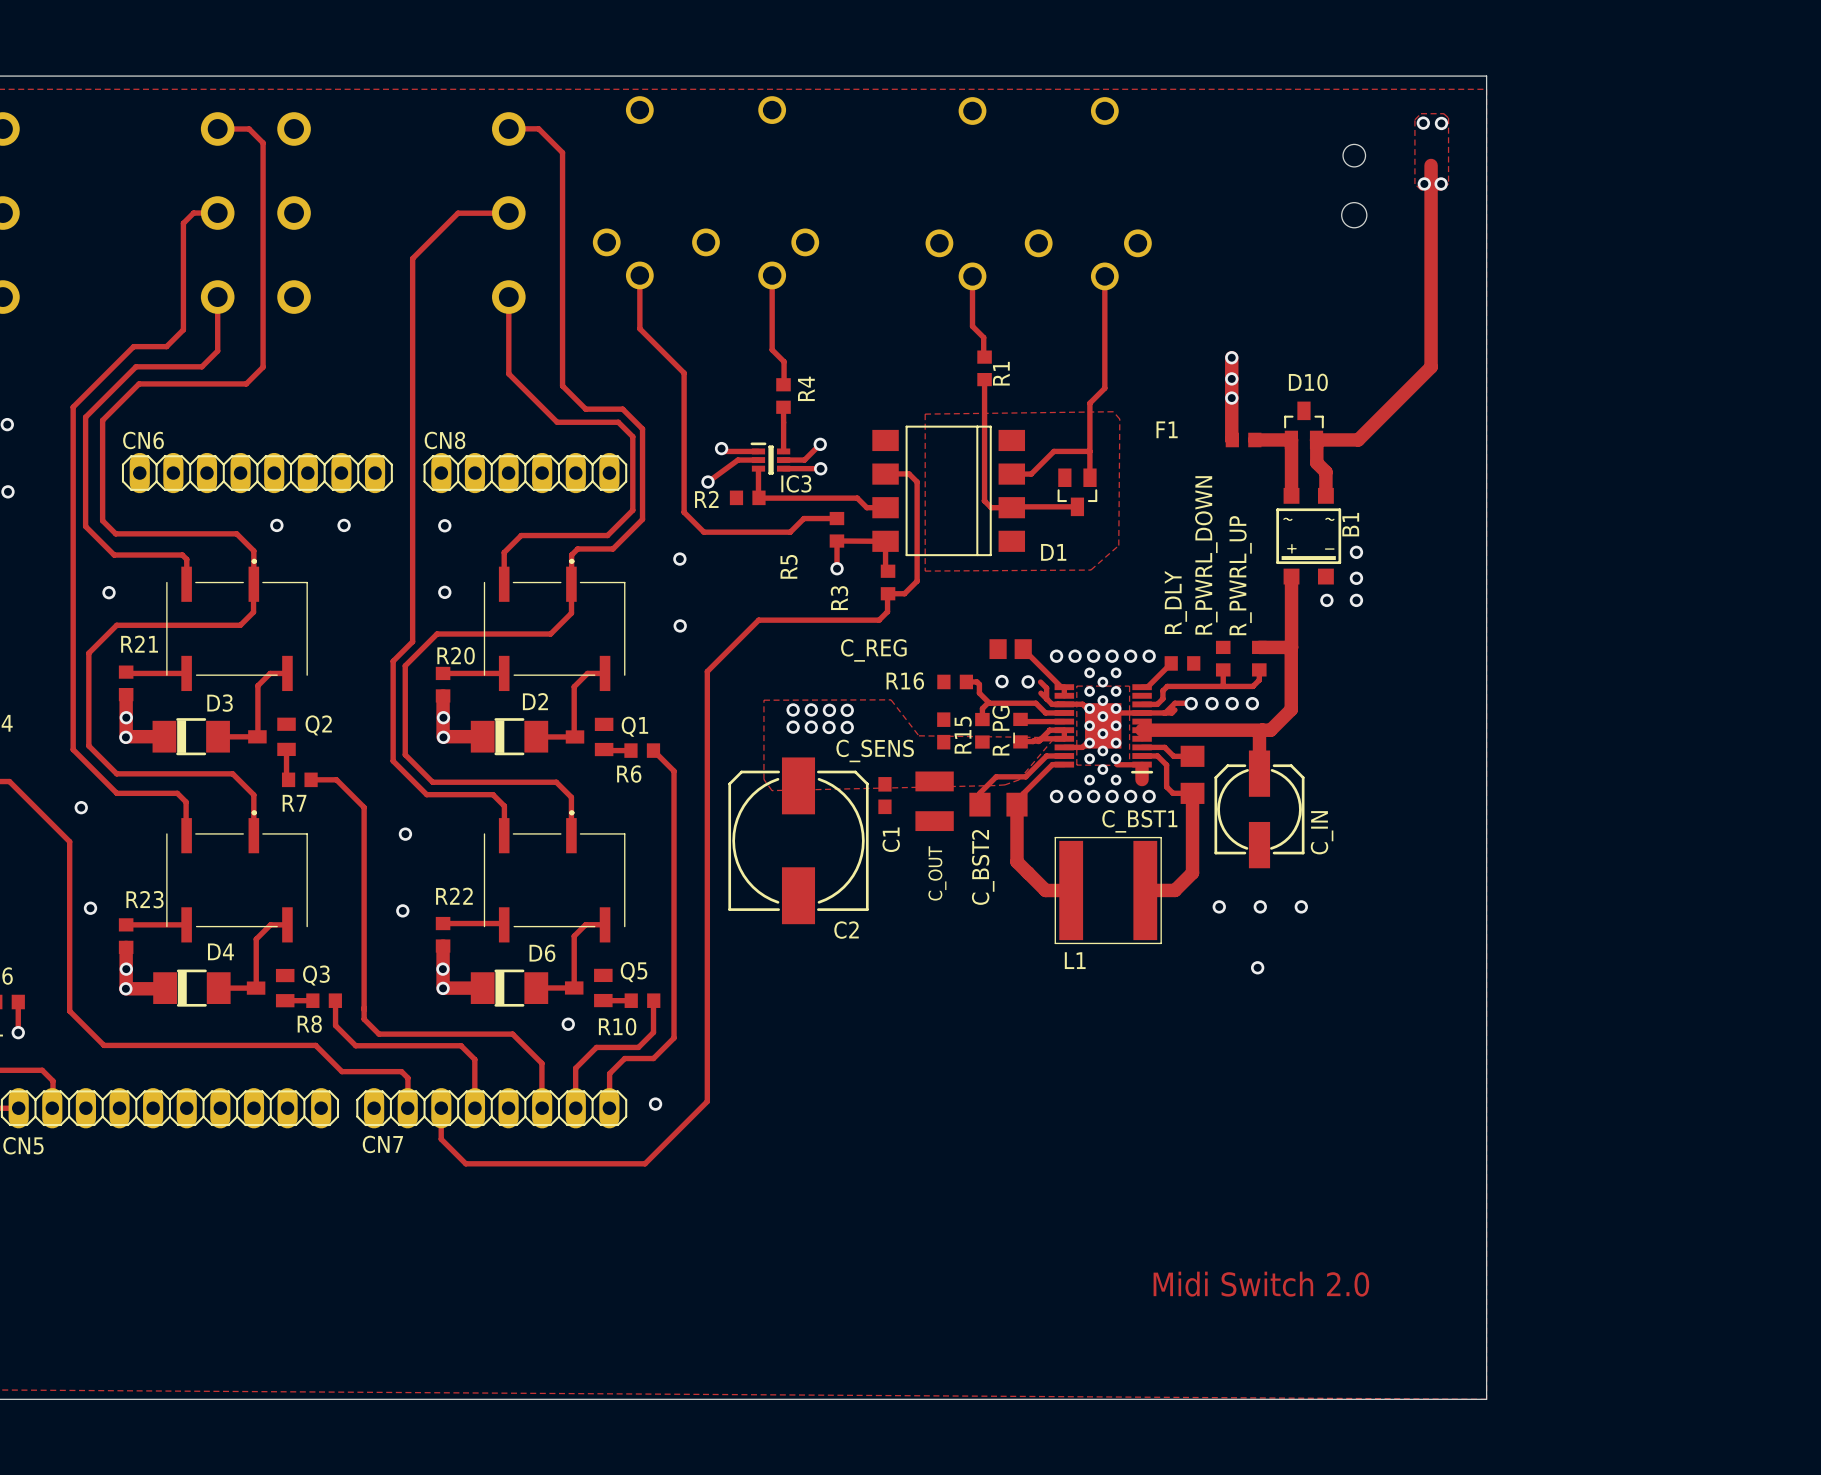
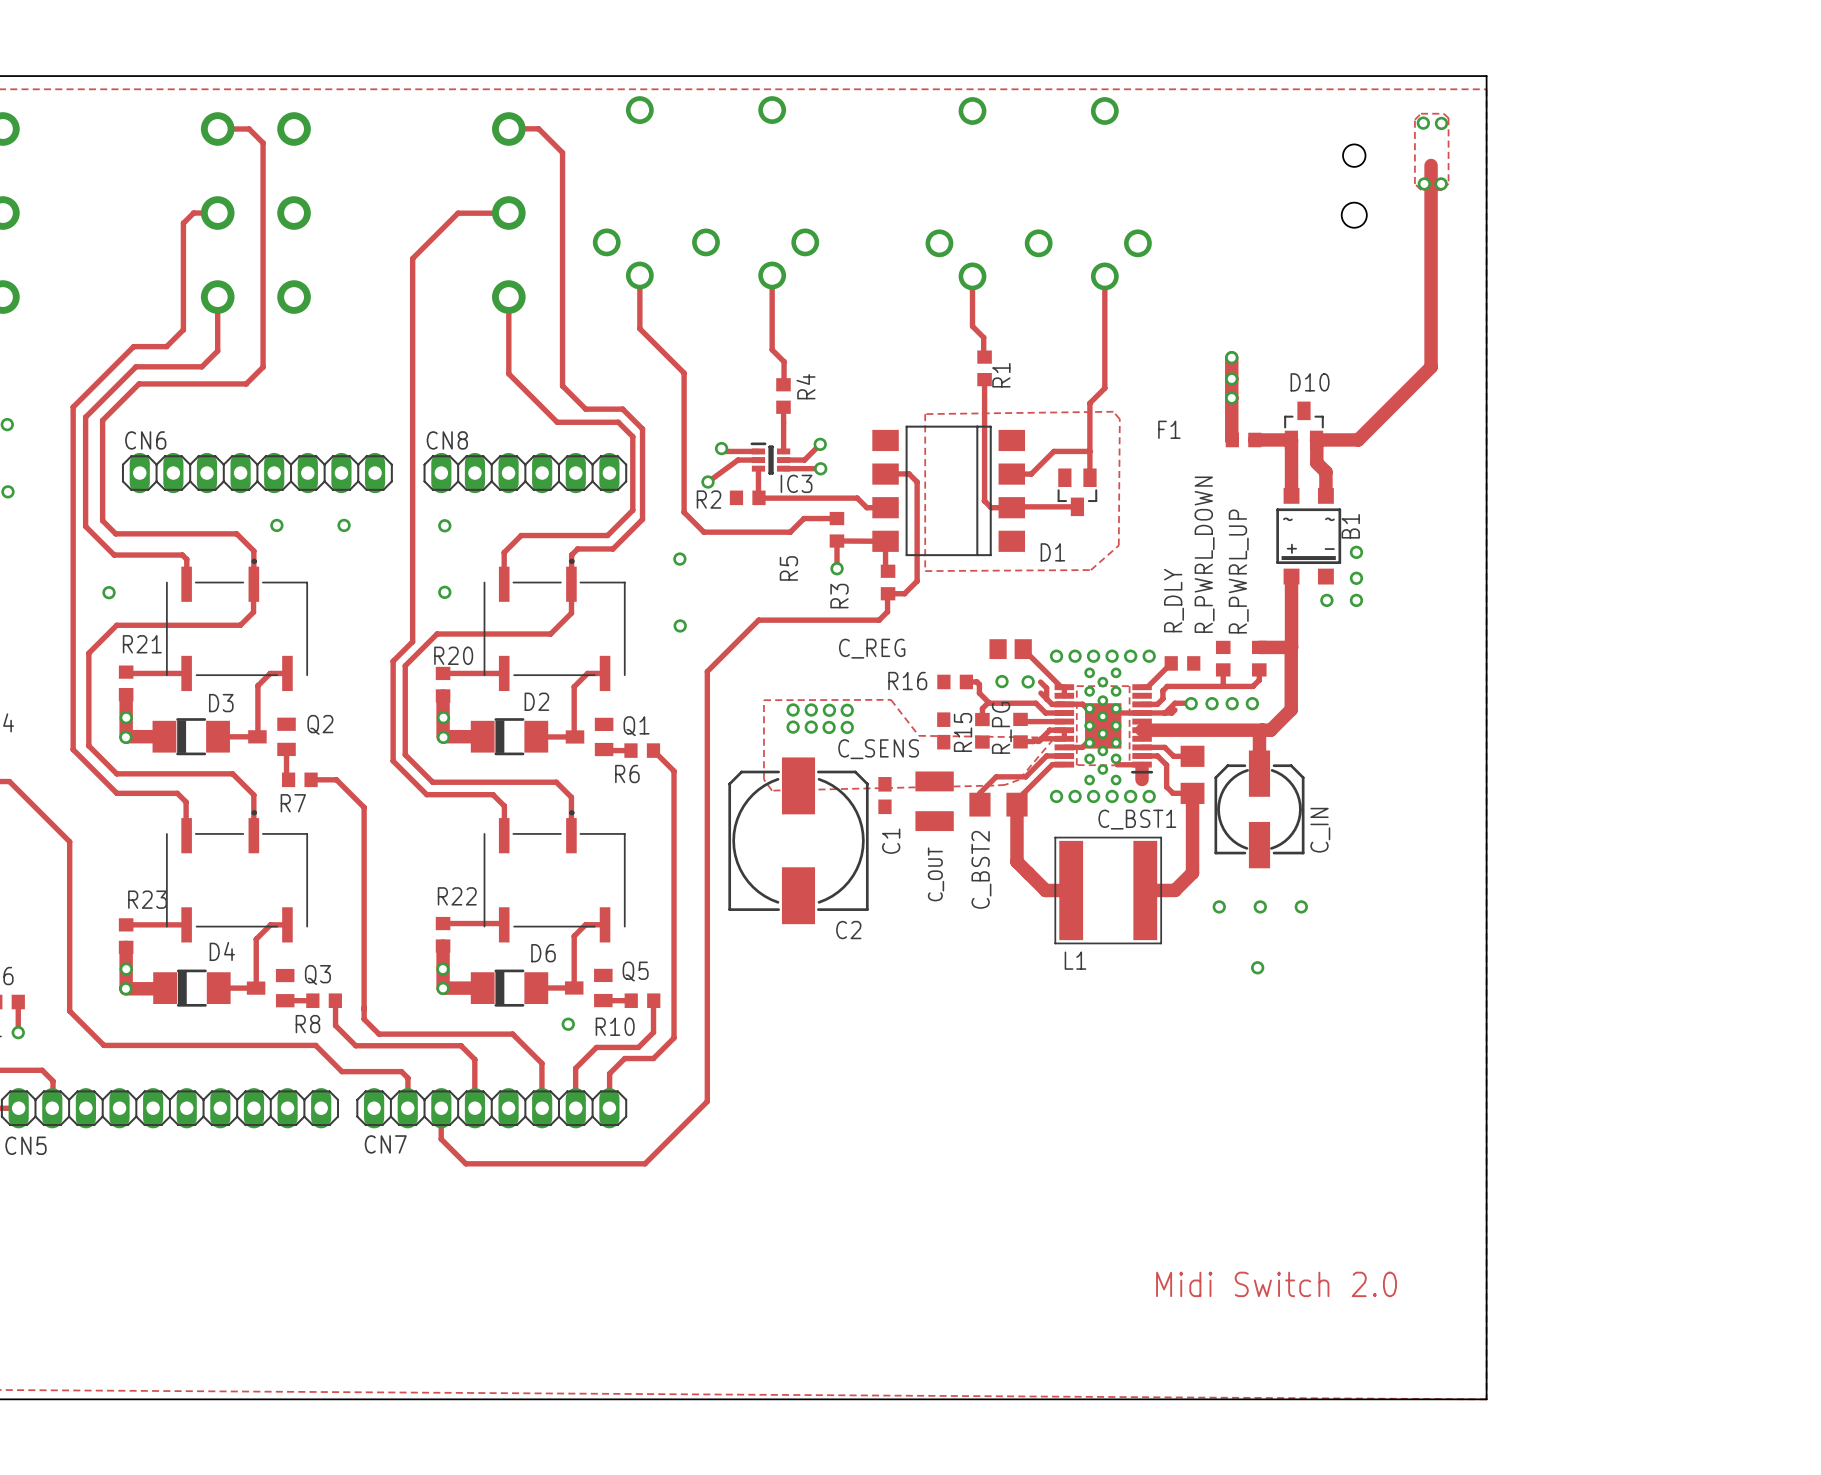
via: (81, 807) -> none
via: (405, 834) -> none
via: (90, 908) -> none
via: (402, 910) -> none
via: (655, 1104) -> none

